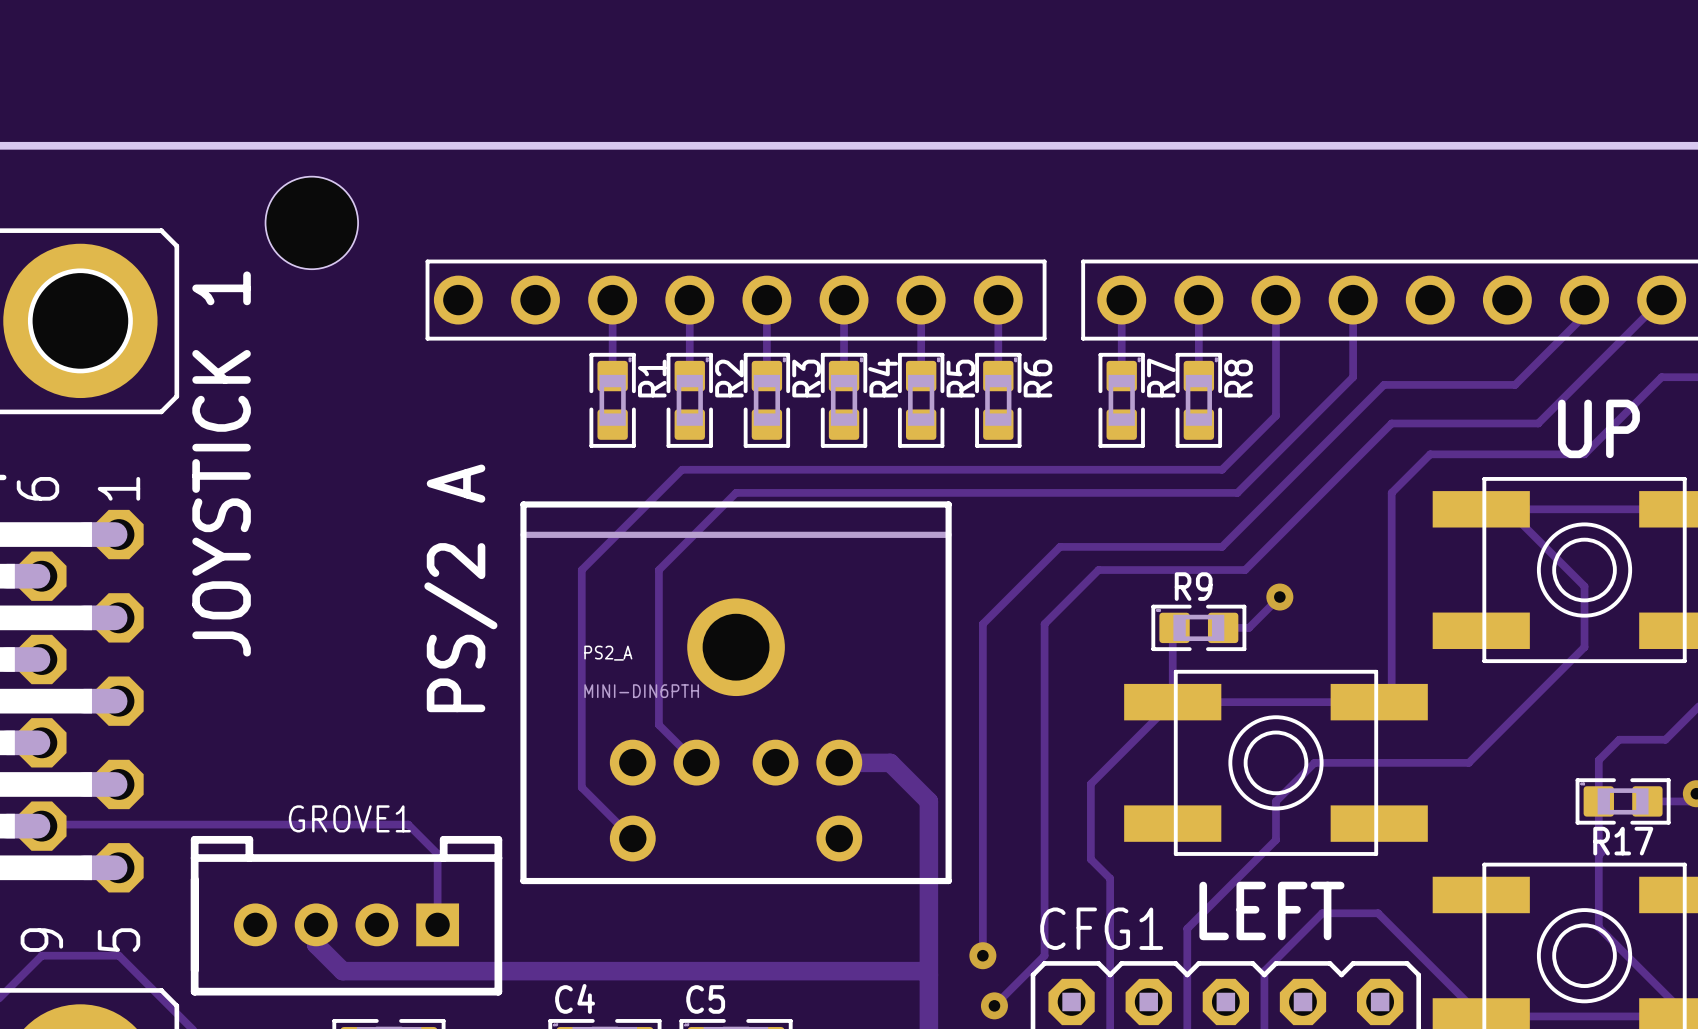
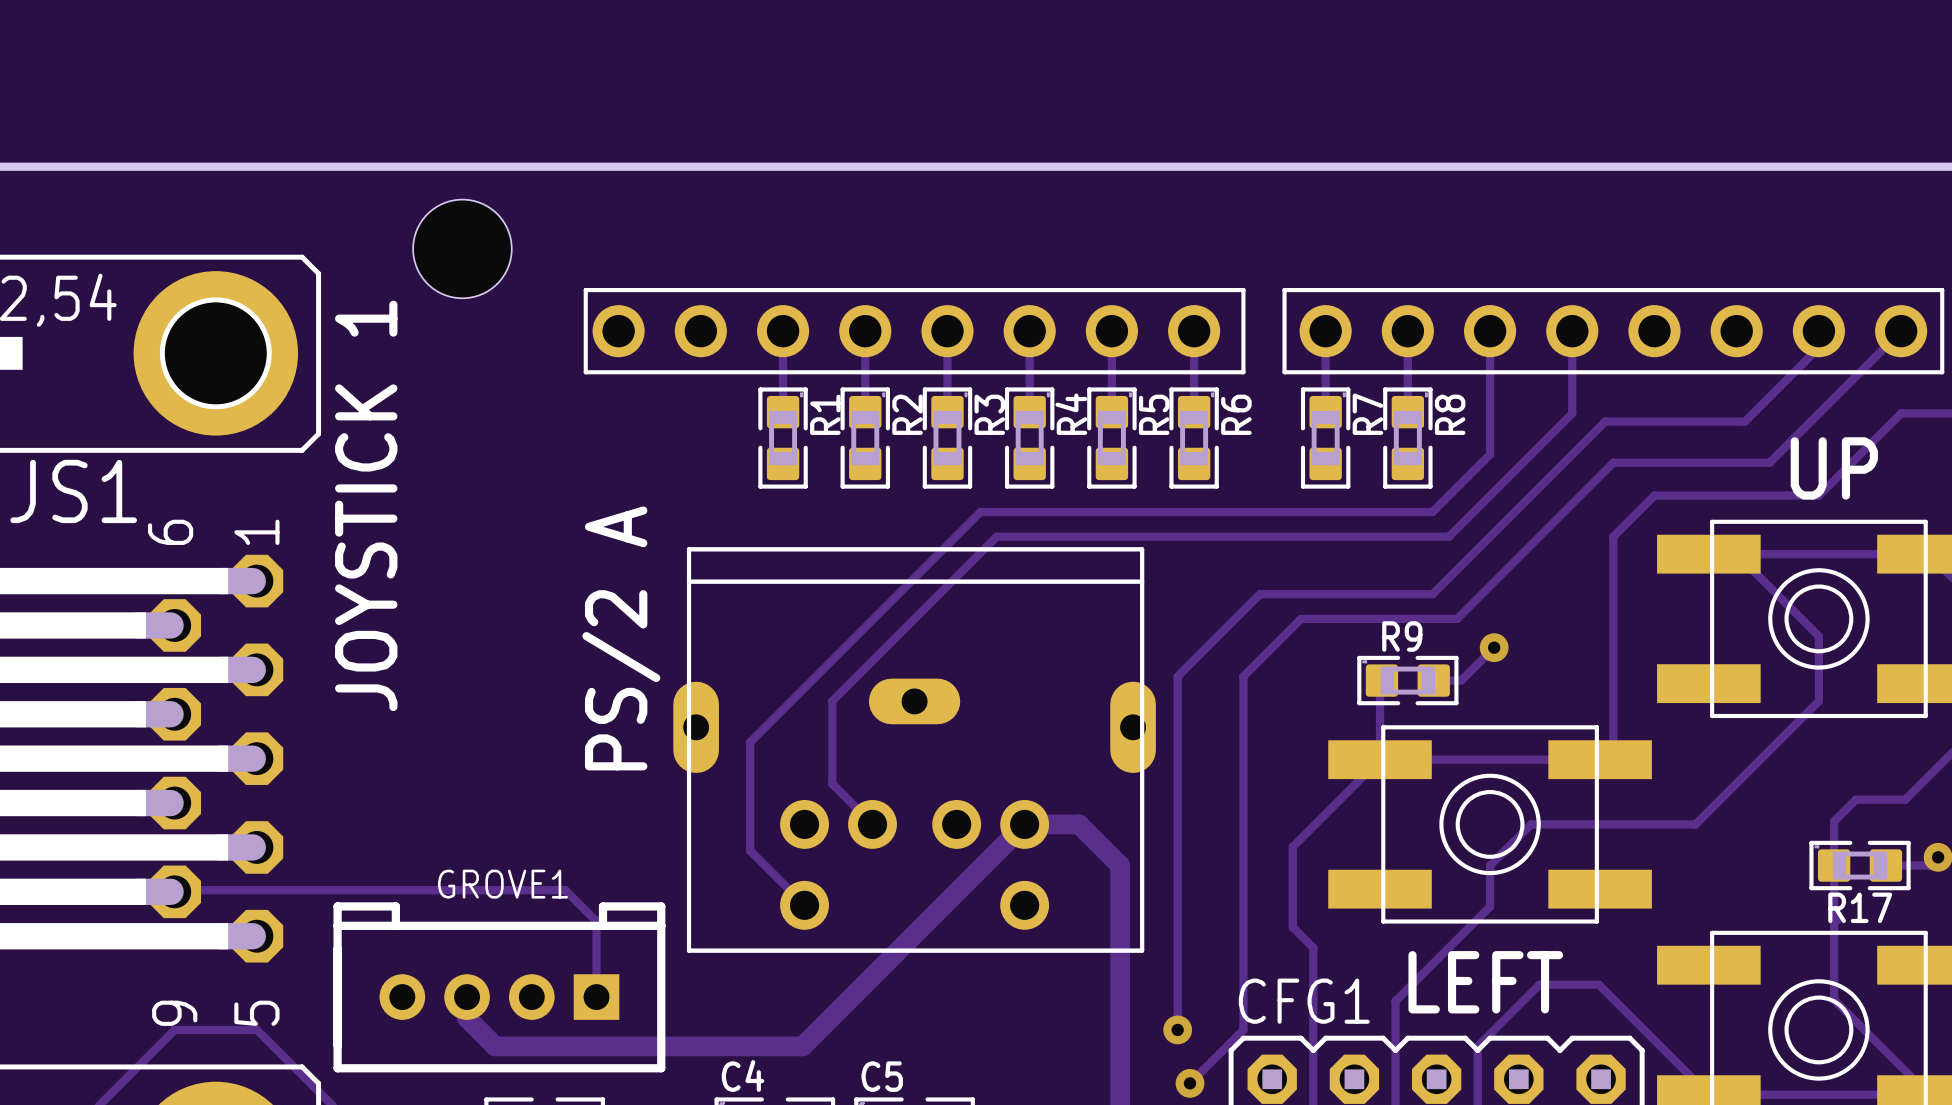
track: (797, 469) (682, 469) (581, 570) (581, 685) -> (980, 512) (750, 742)
track: (813, 492) (736, 492) (658, 570) (658, 647) -> (996, 536) (832, 701)
PS2_A: MINI-DIN6PTH (736, 692) -> none
part: none -> (914, 749)
track: (631, 971) (925, 971) (928, 974) -> (802, 1046) (1024, 824)

